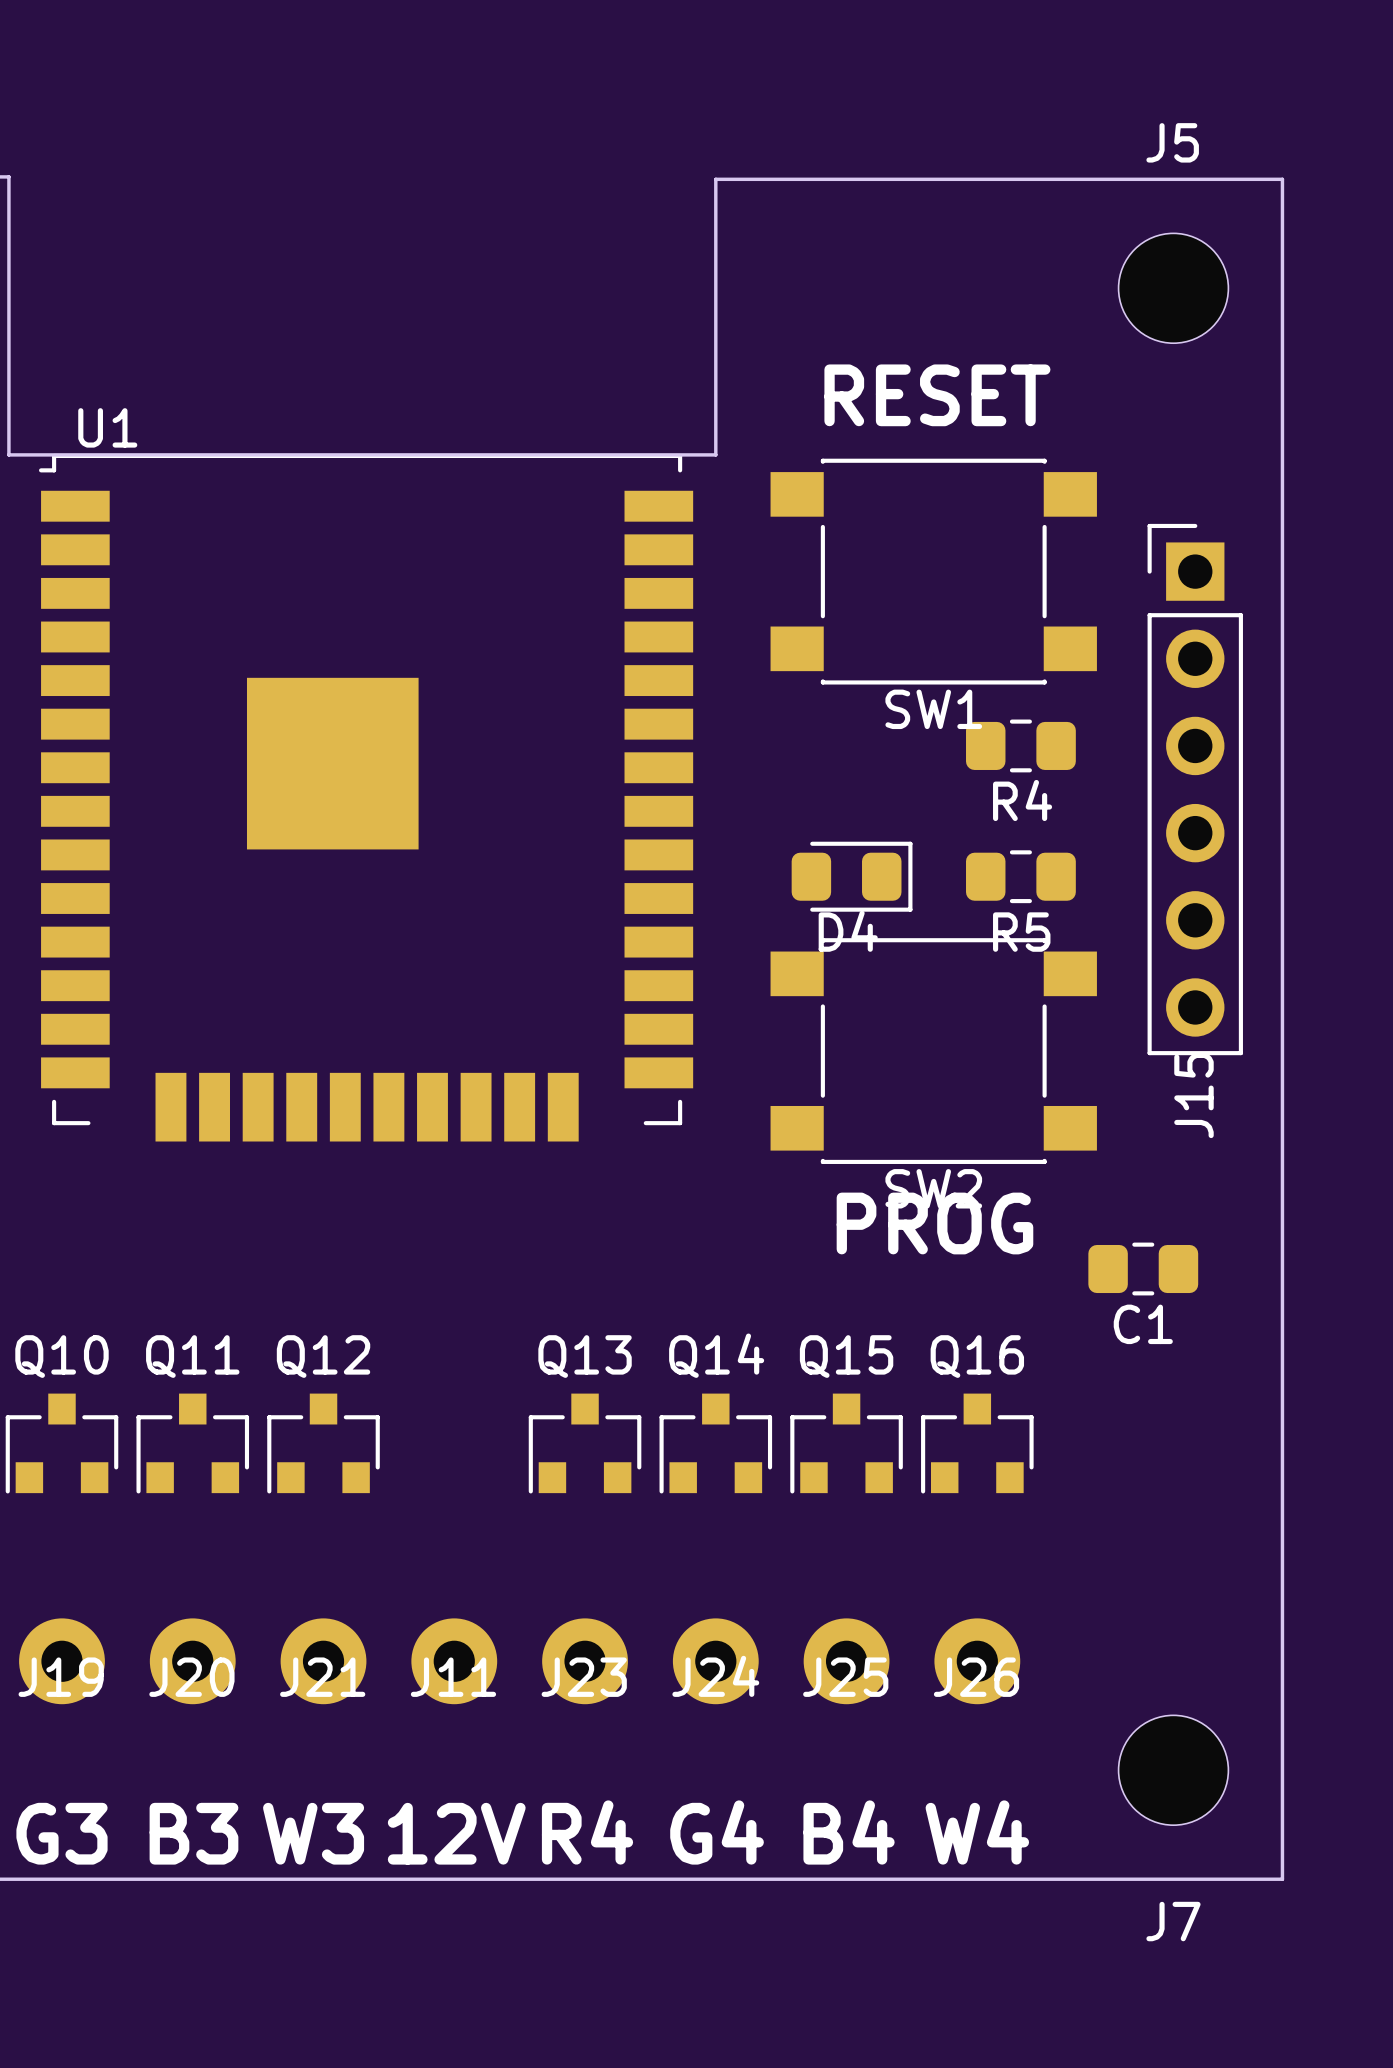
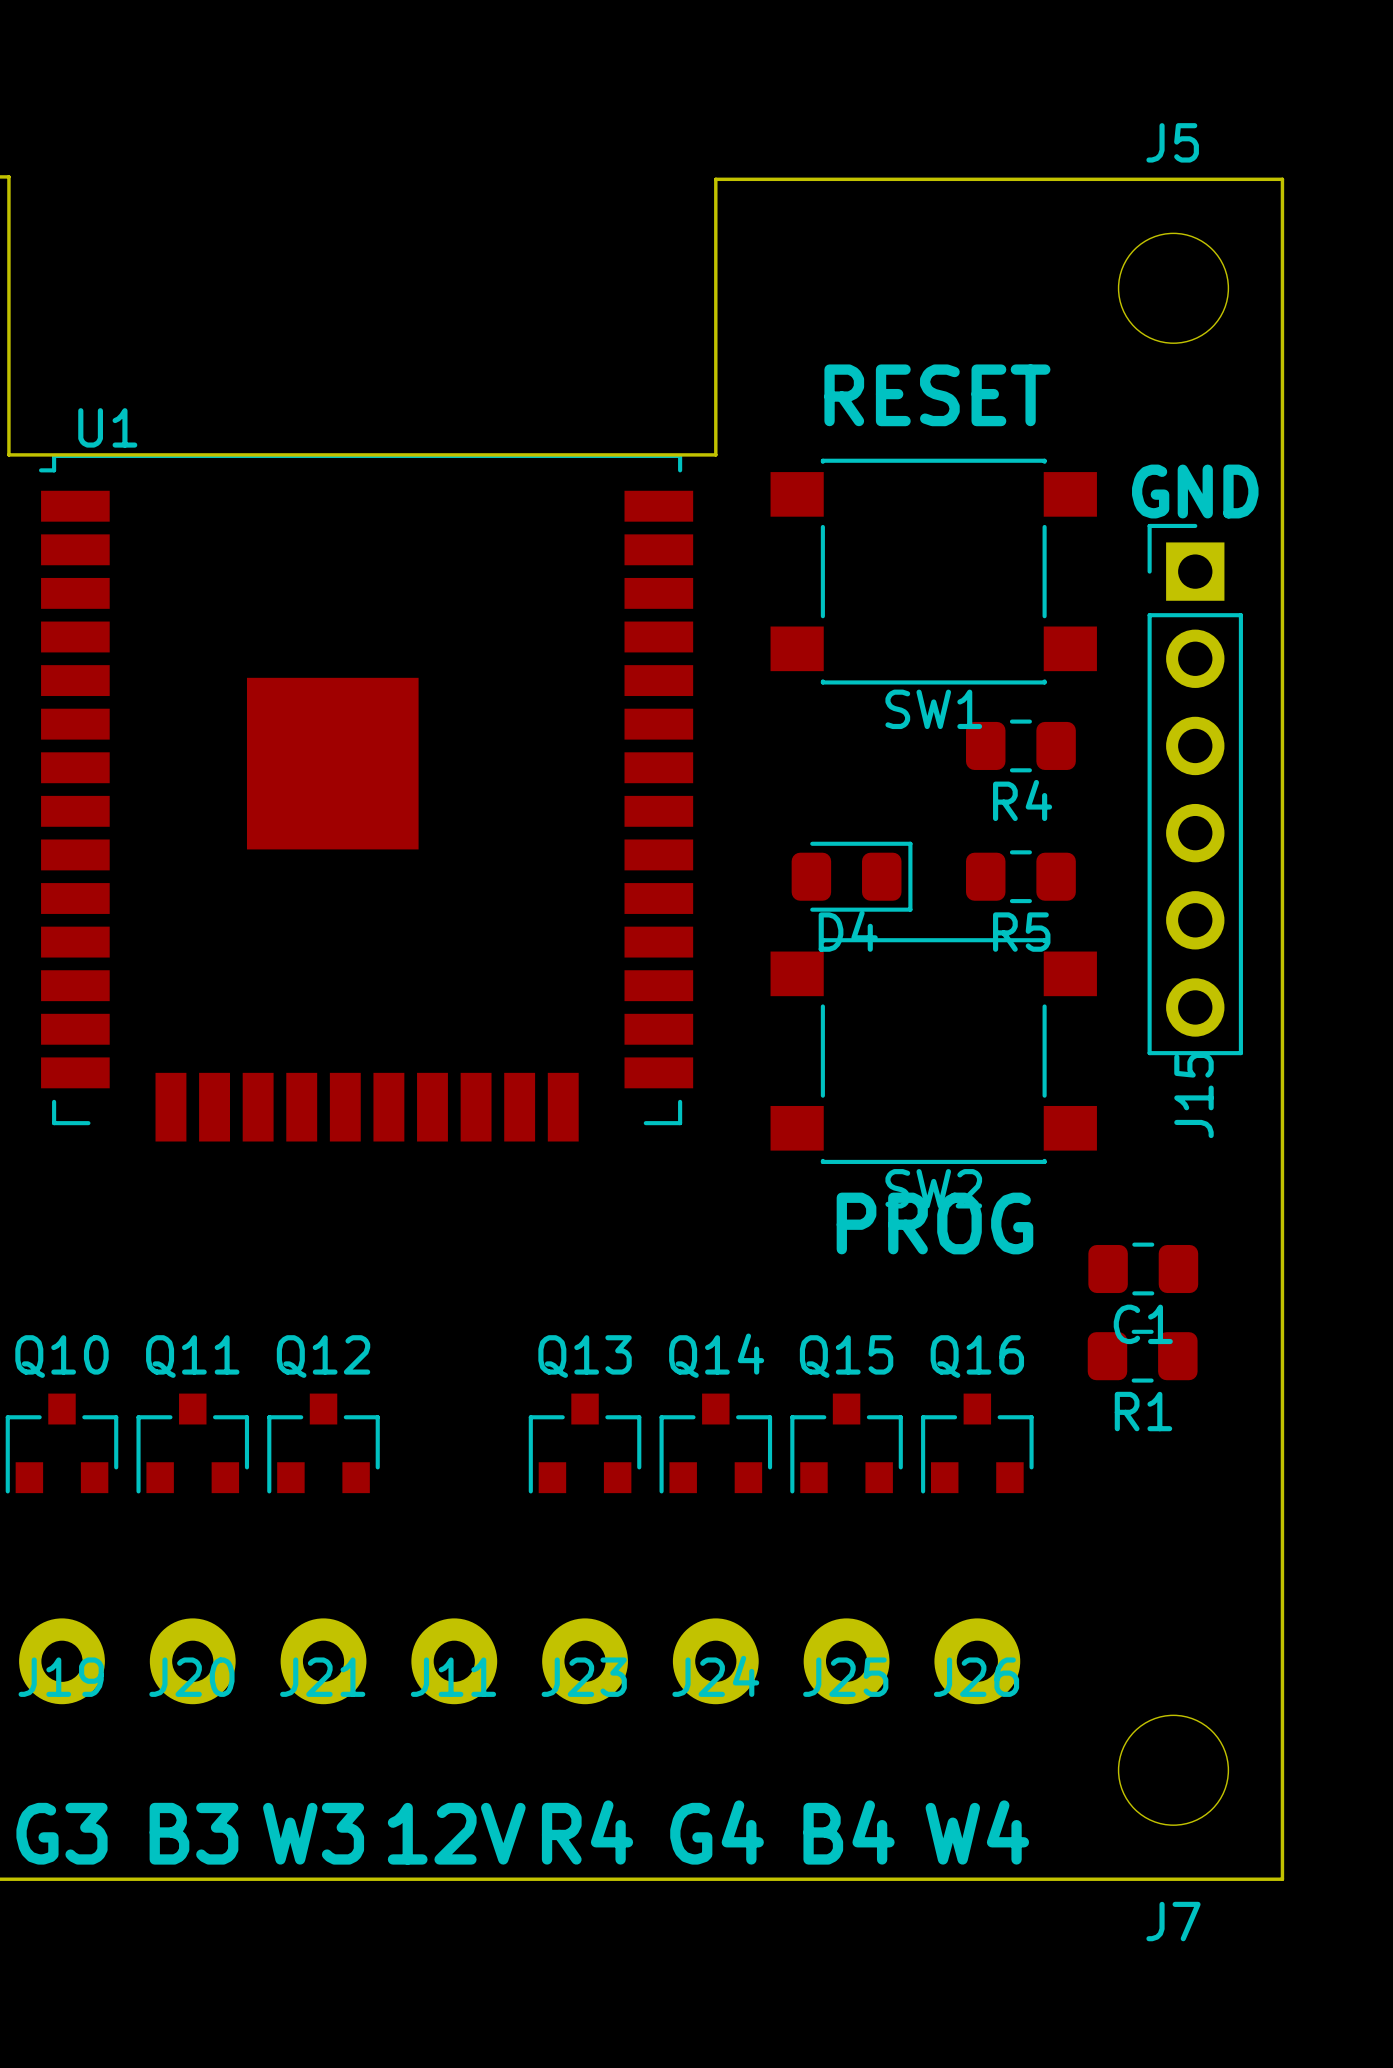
text: none -> GND (1195, 491)
R1: none -> (1142, 1356)

